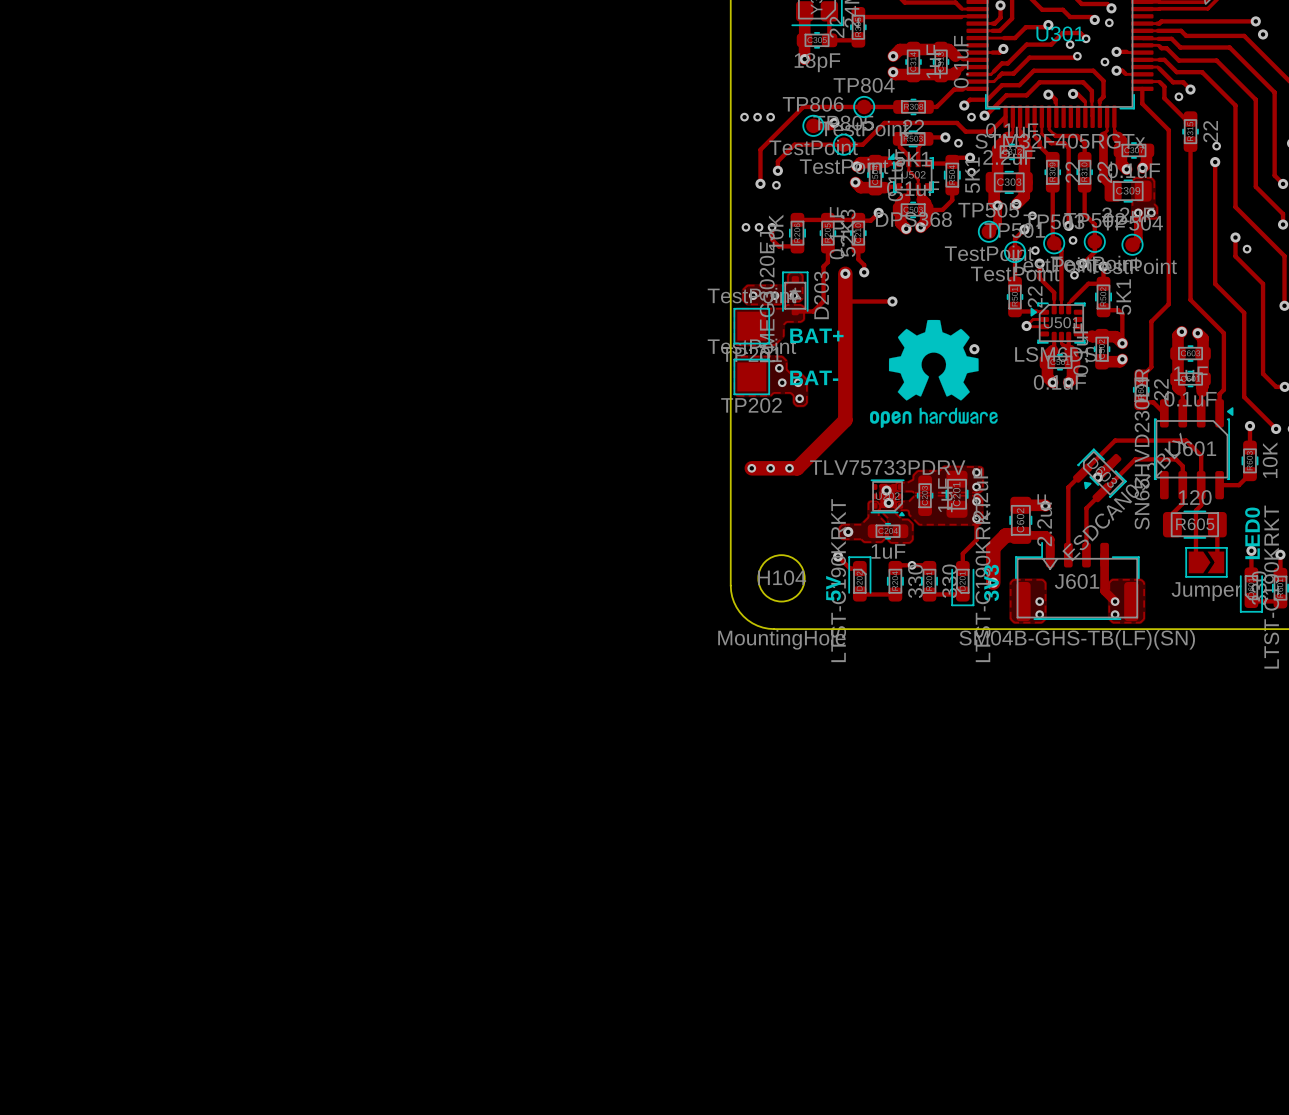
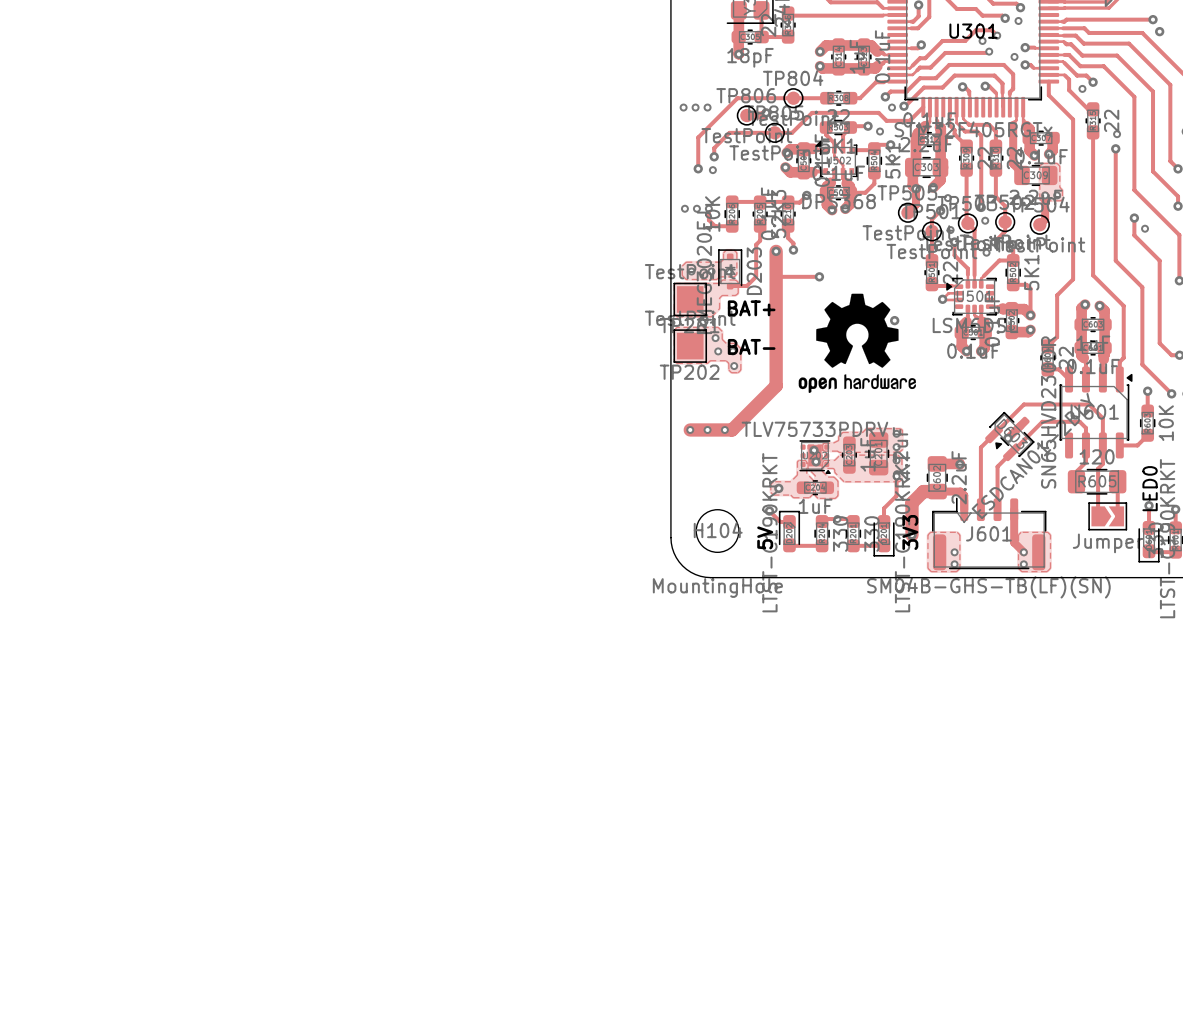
track: (1048, 25) (1046, 27) (1025, 27) (1015, 38) (977, 38) -> none
via: (1048, 25) -> none

